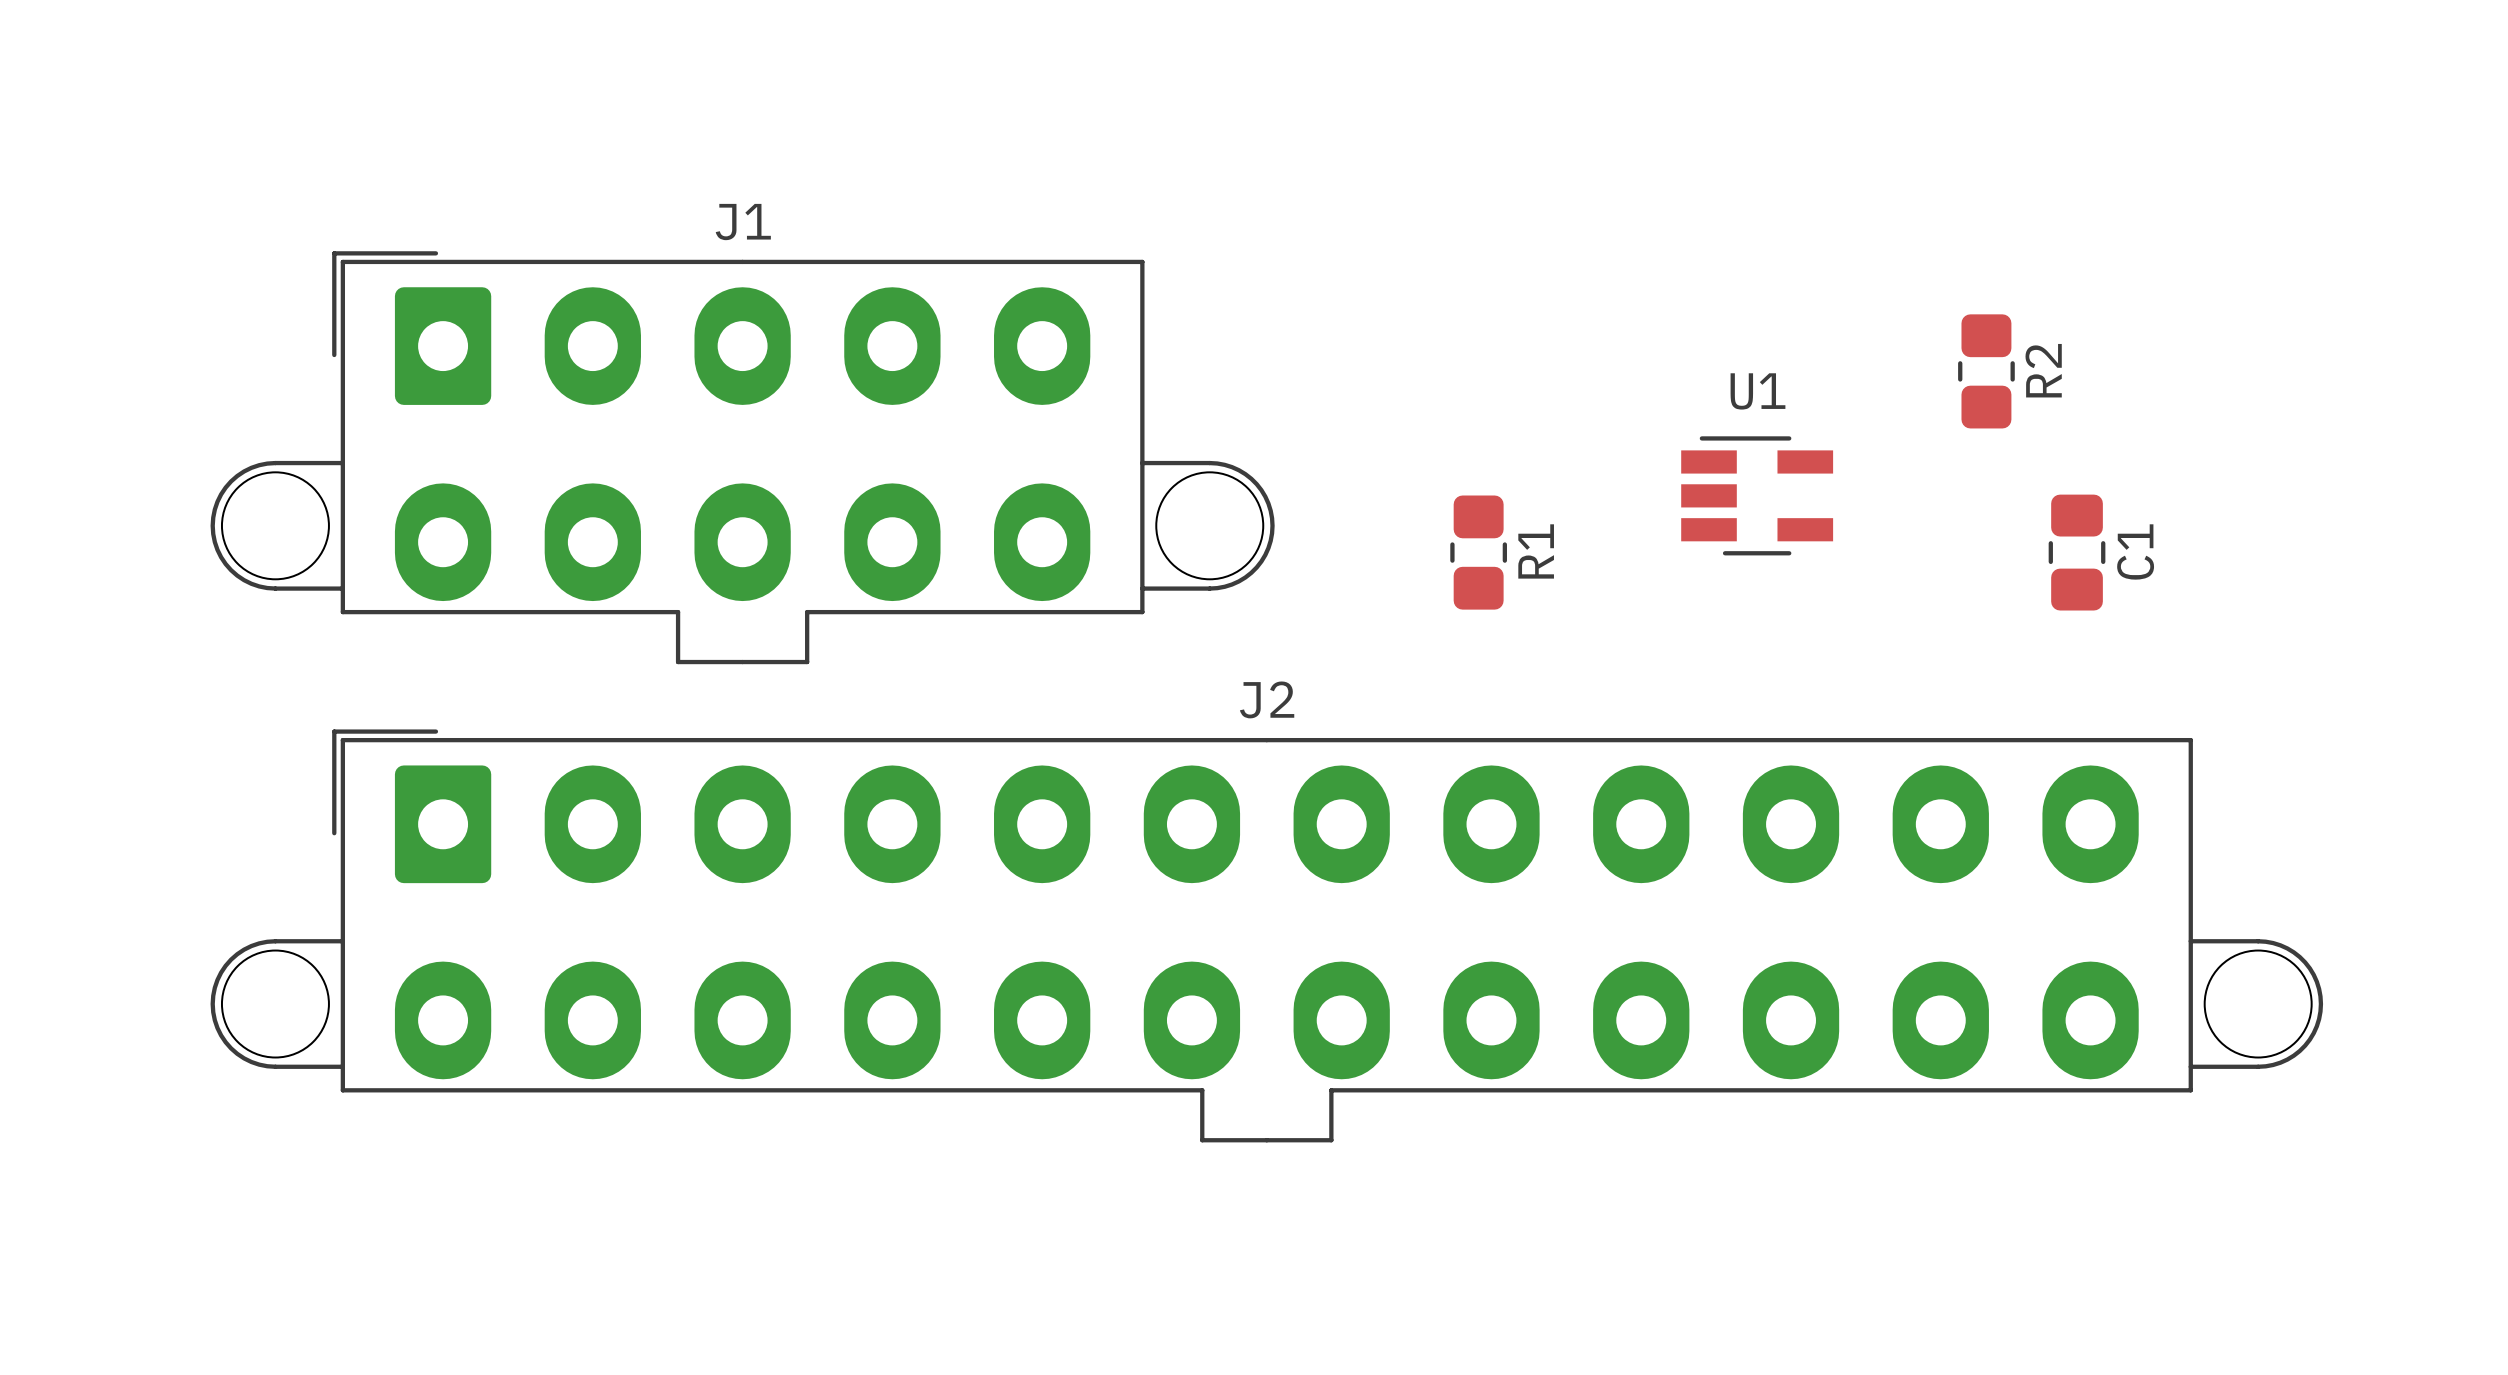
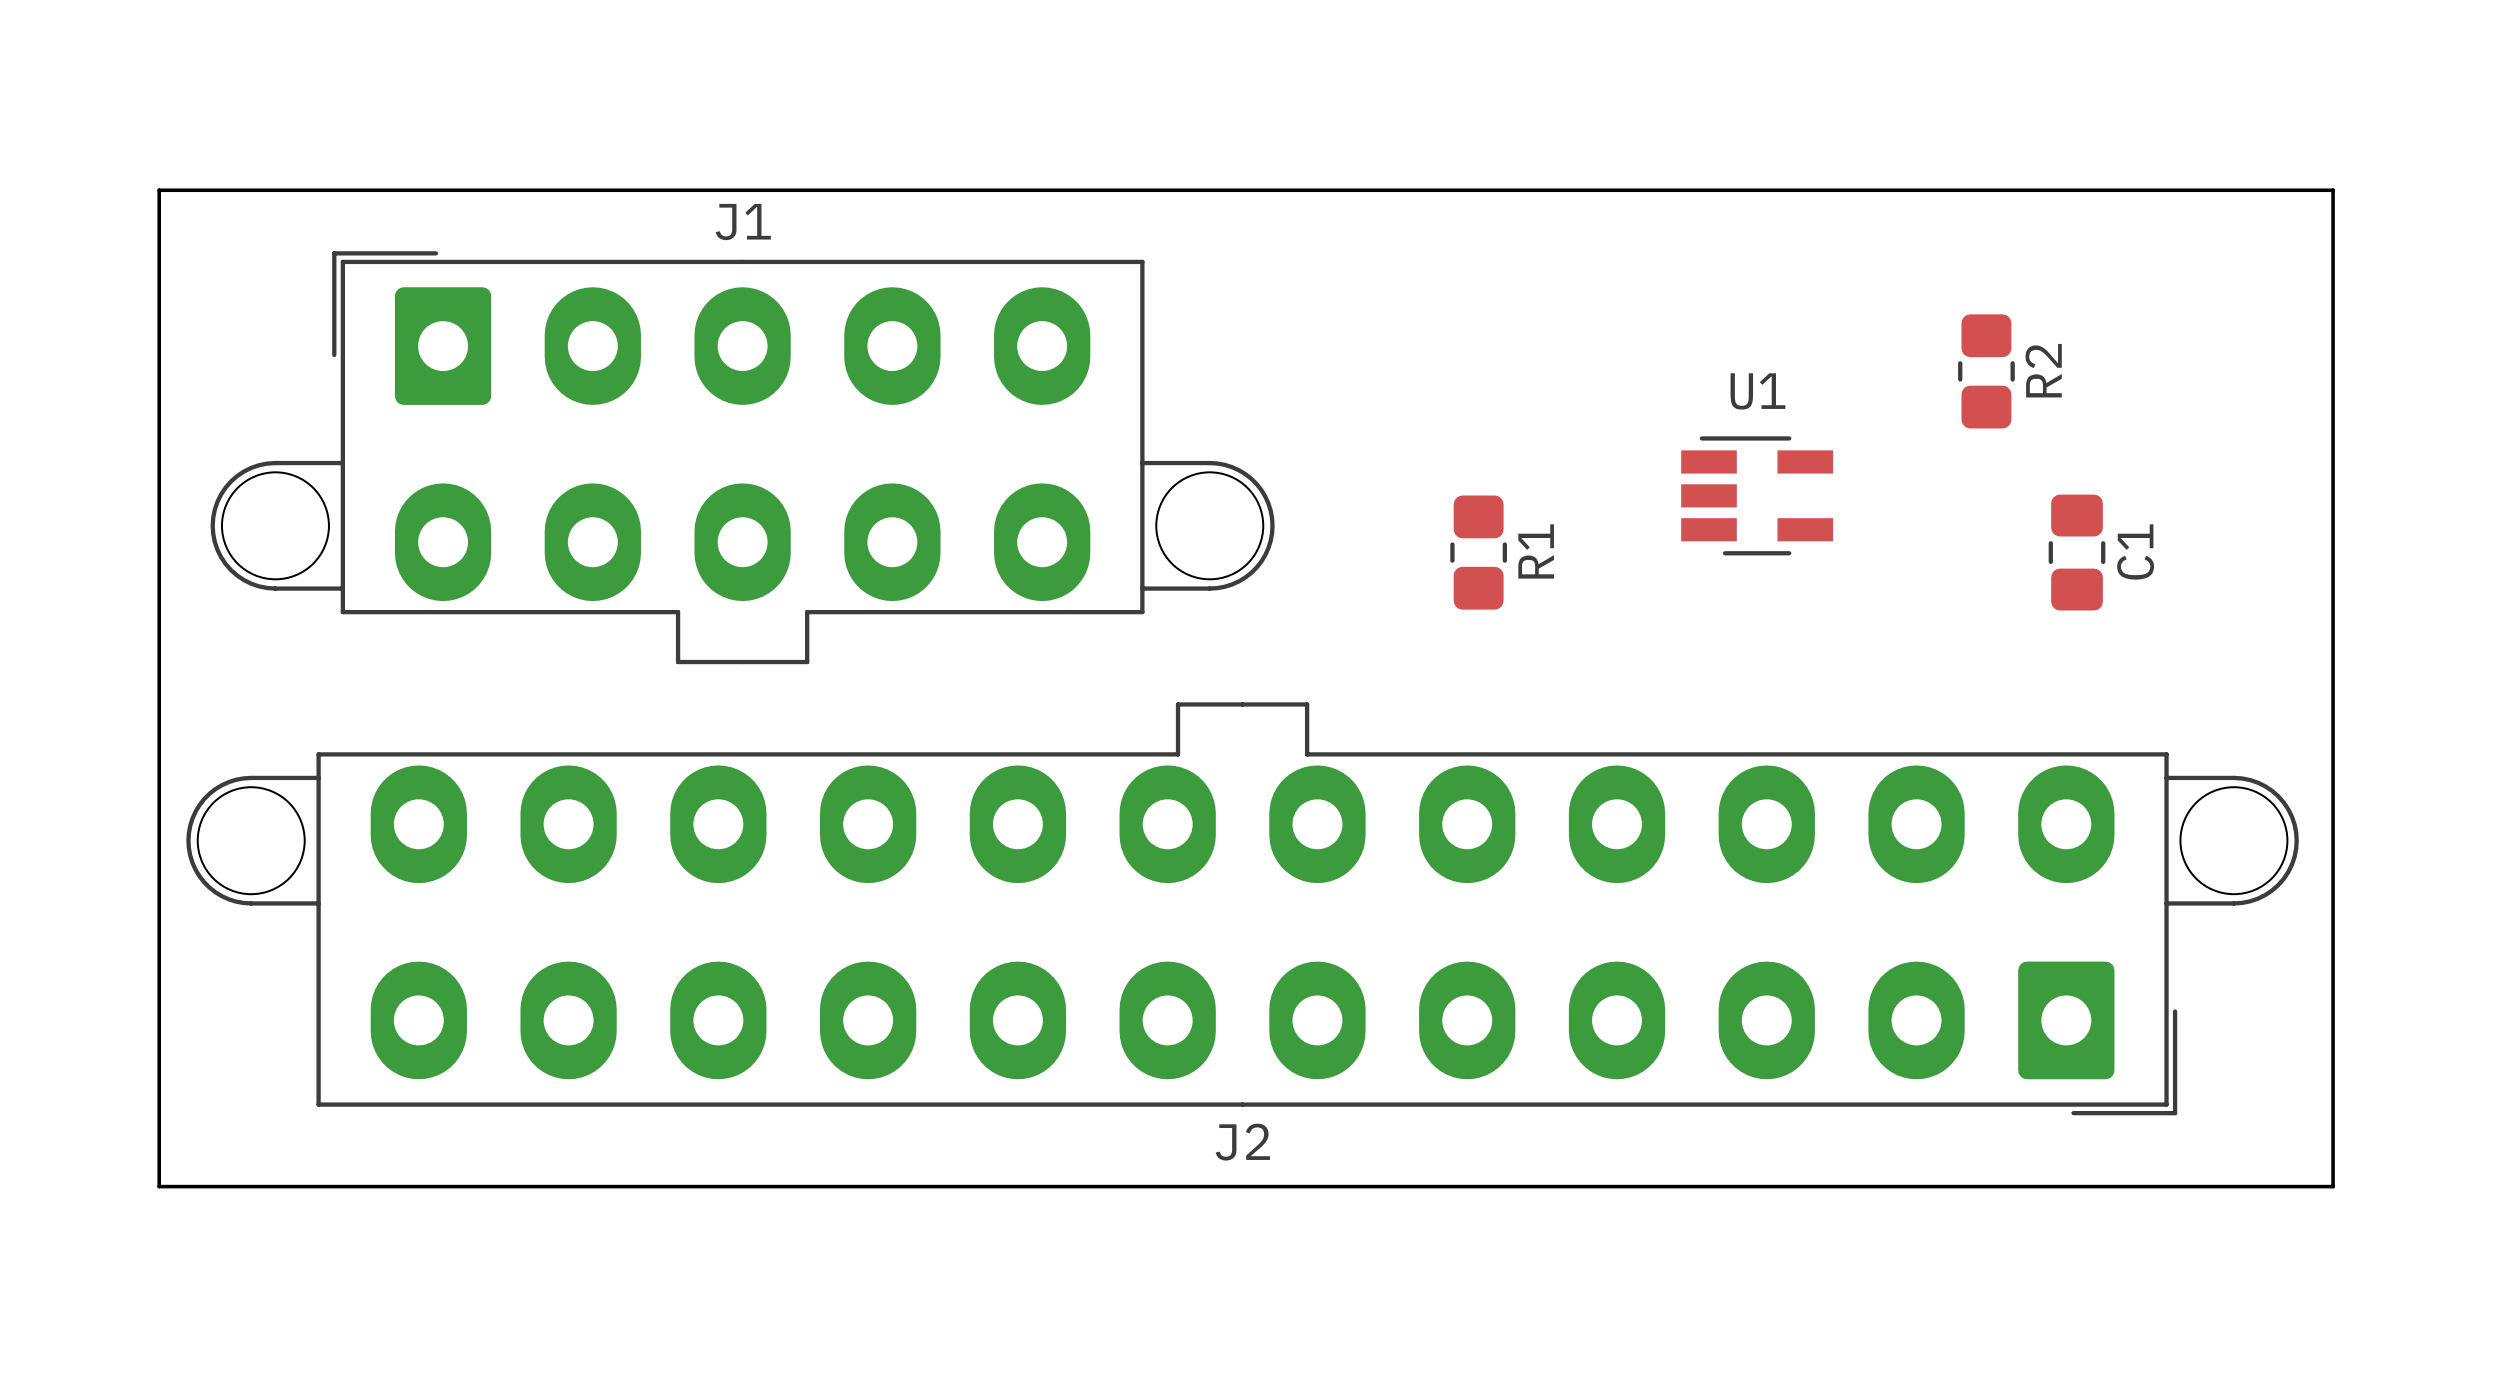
board edge: none -> (159, 190) (2333, 190) (2333, 1186) (159, 1186) (159, 190)
J2 rotation: 0° (1266, 935) -> 180° (1242, 908)

